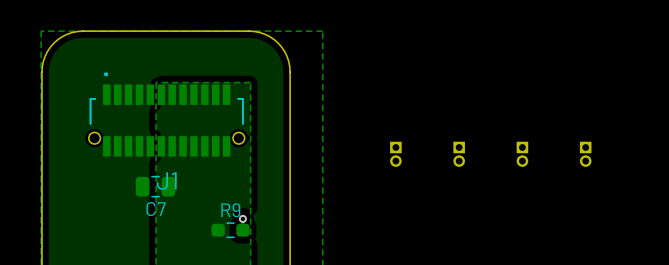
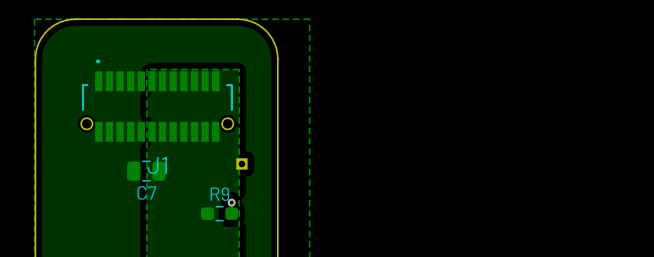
part: (395, 154) -> none
part: (459, 154) -> none
part: (522, 154) -> none
part: (585, 154) -> none
part: none -> (241, 163)

